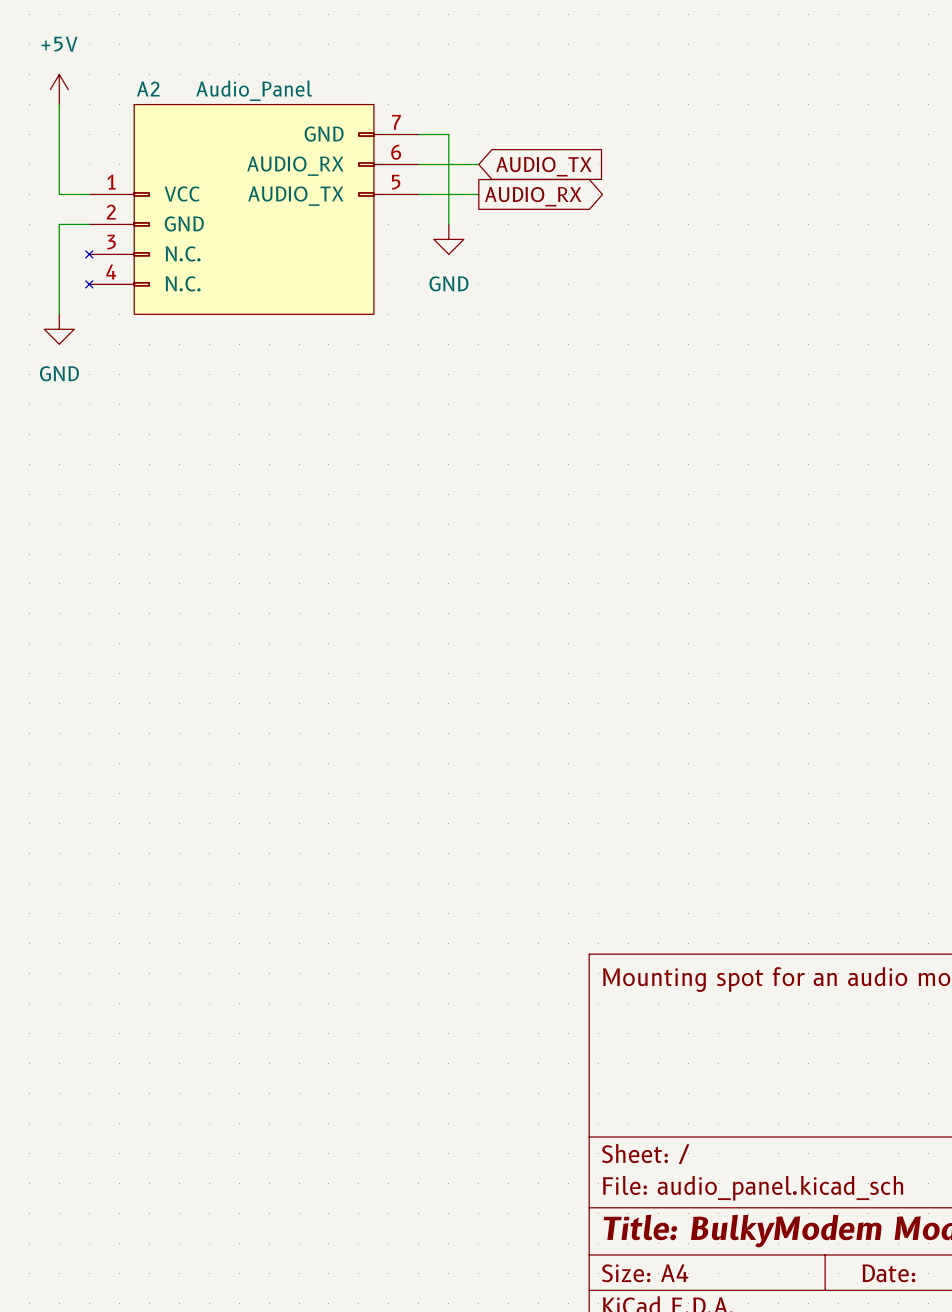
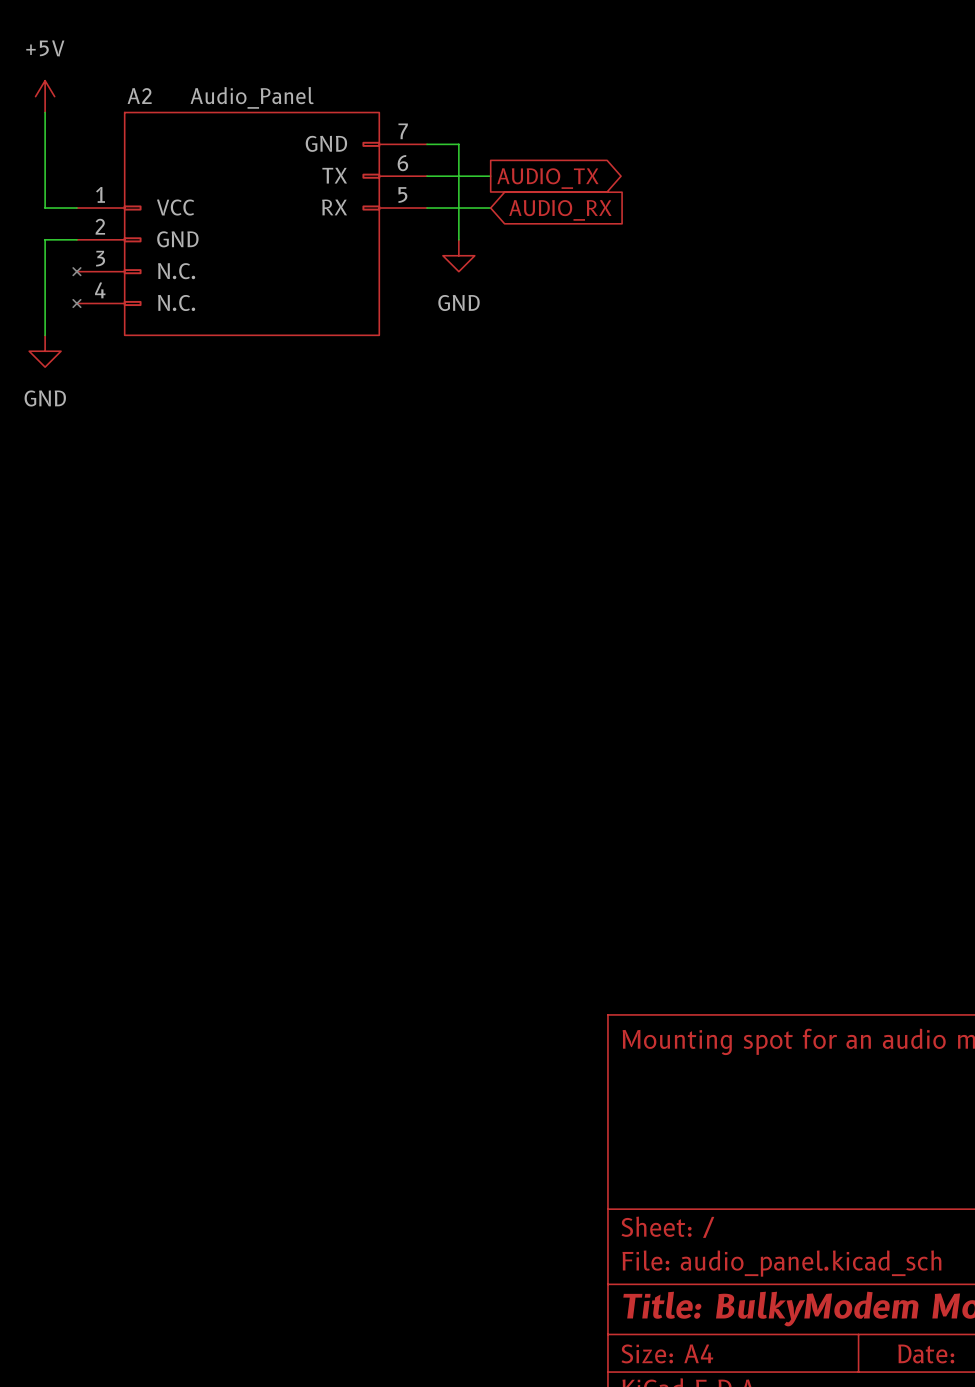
A2 pin name: AUDIO_RX (295, 166) -> TX (334, 175)
global label shape: input (543, 166) -> output (547, 178)
A2 pin name: AUDIO_TX (295, 196) -> RX (334, 207)
global label shape: output (533, 196) -> input (560, 210)

